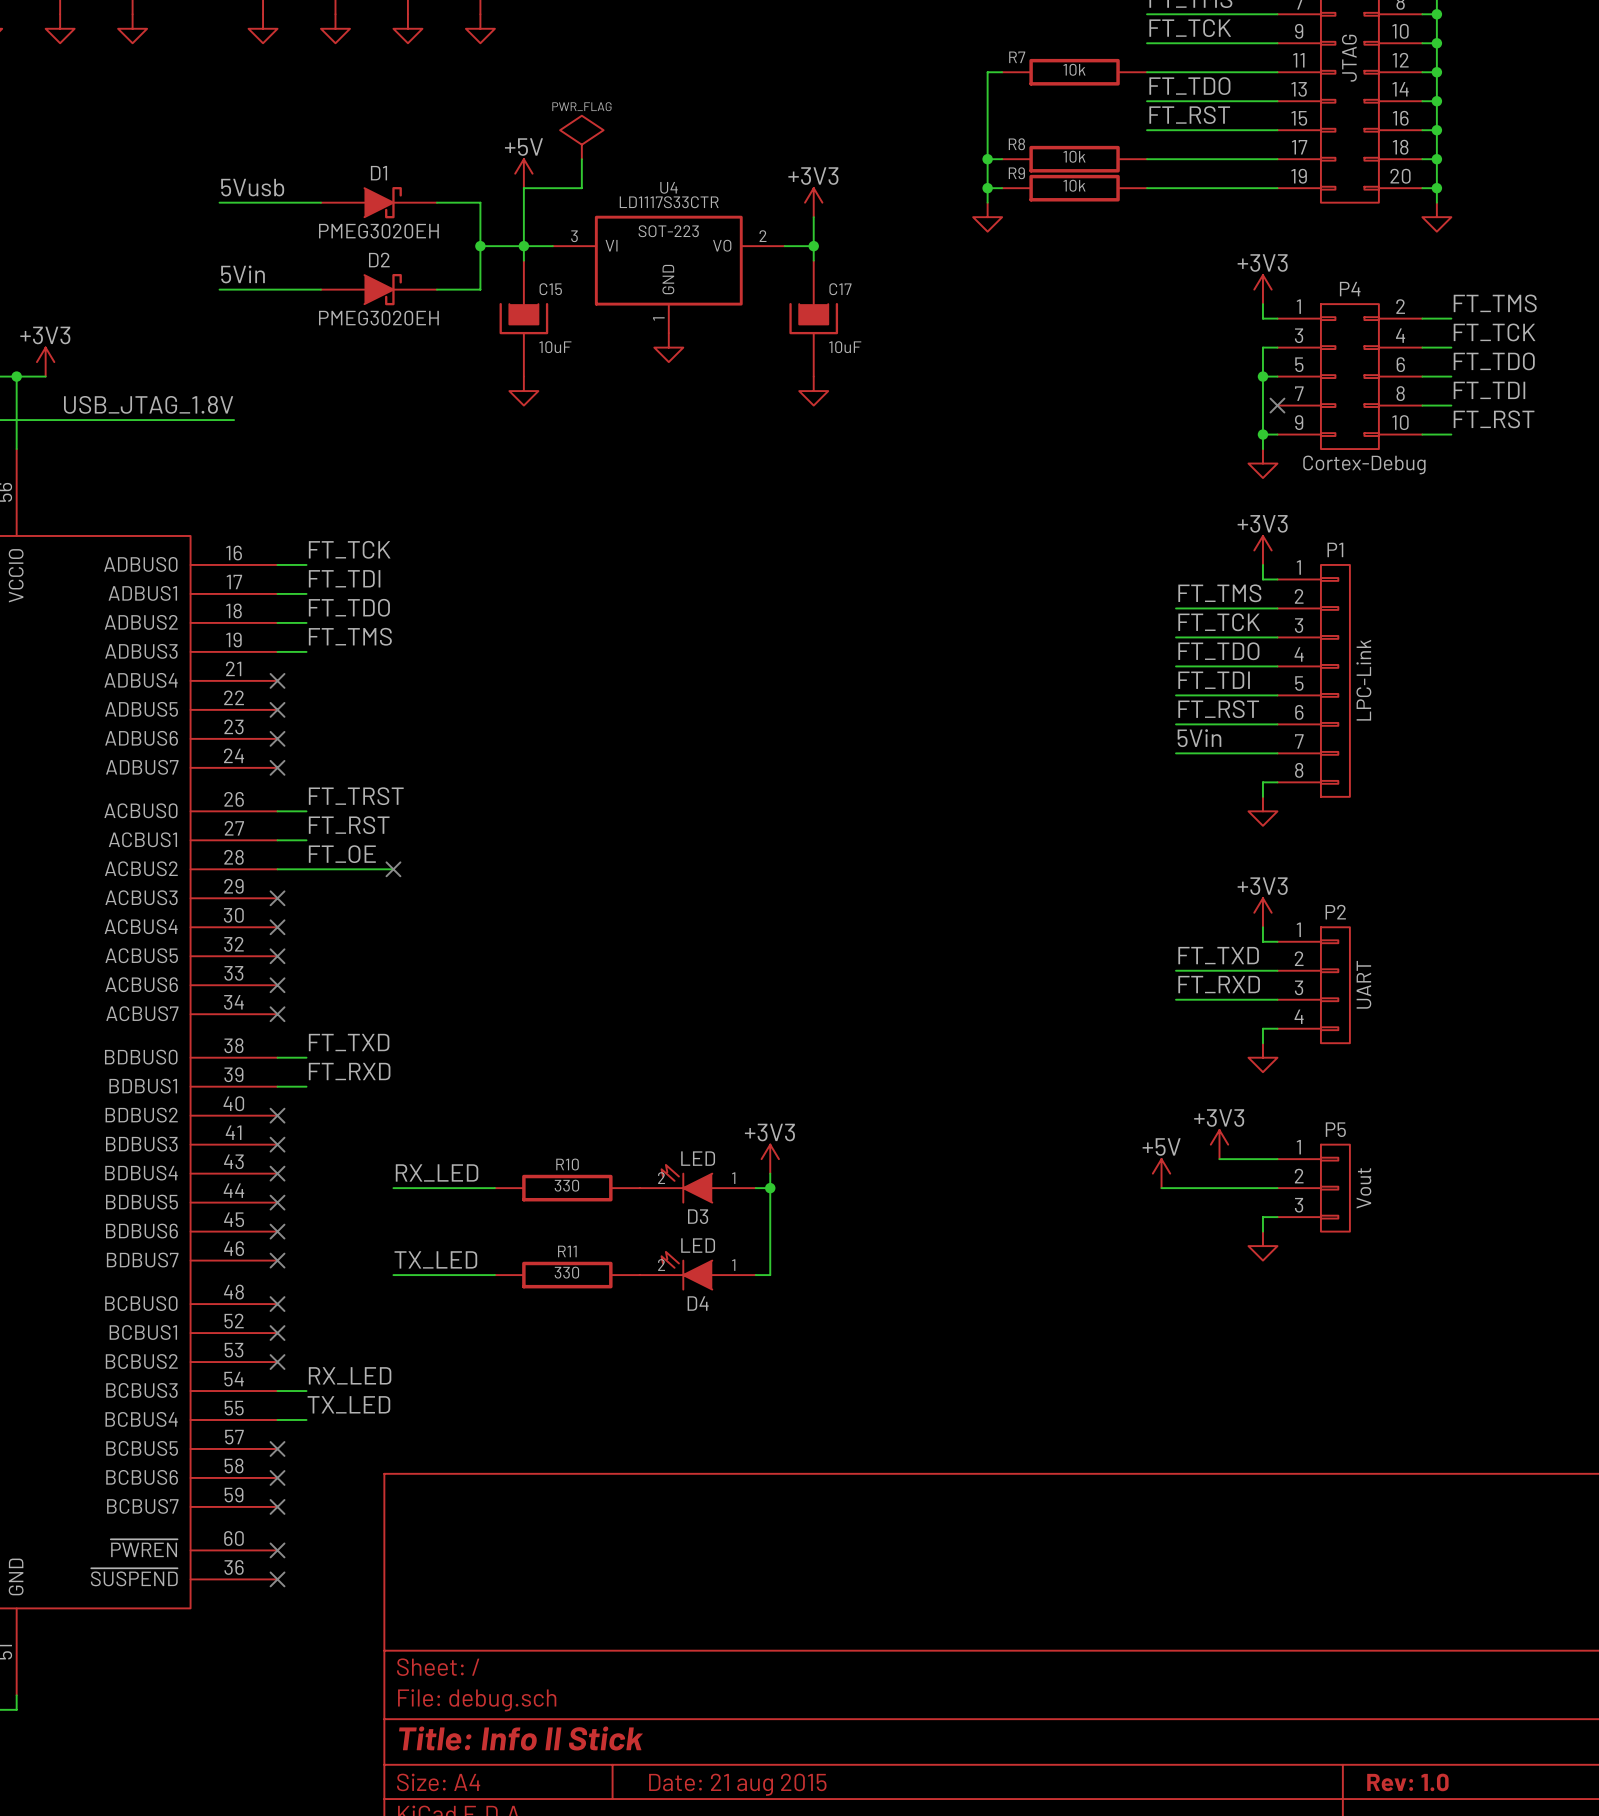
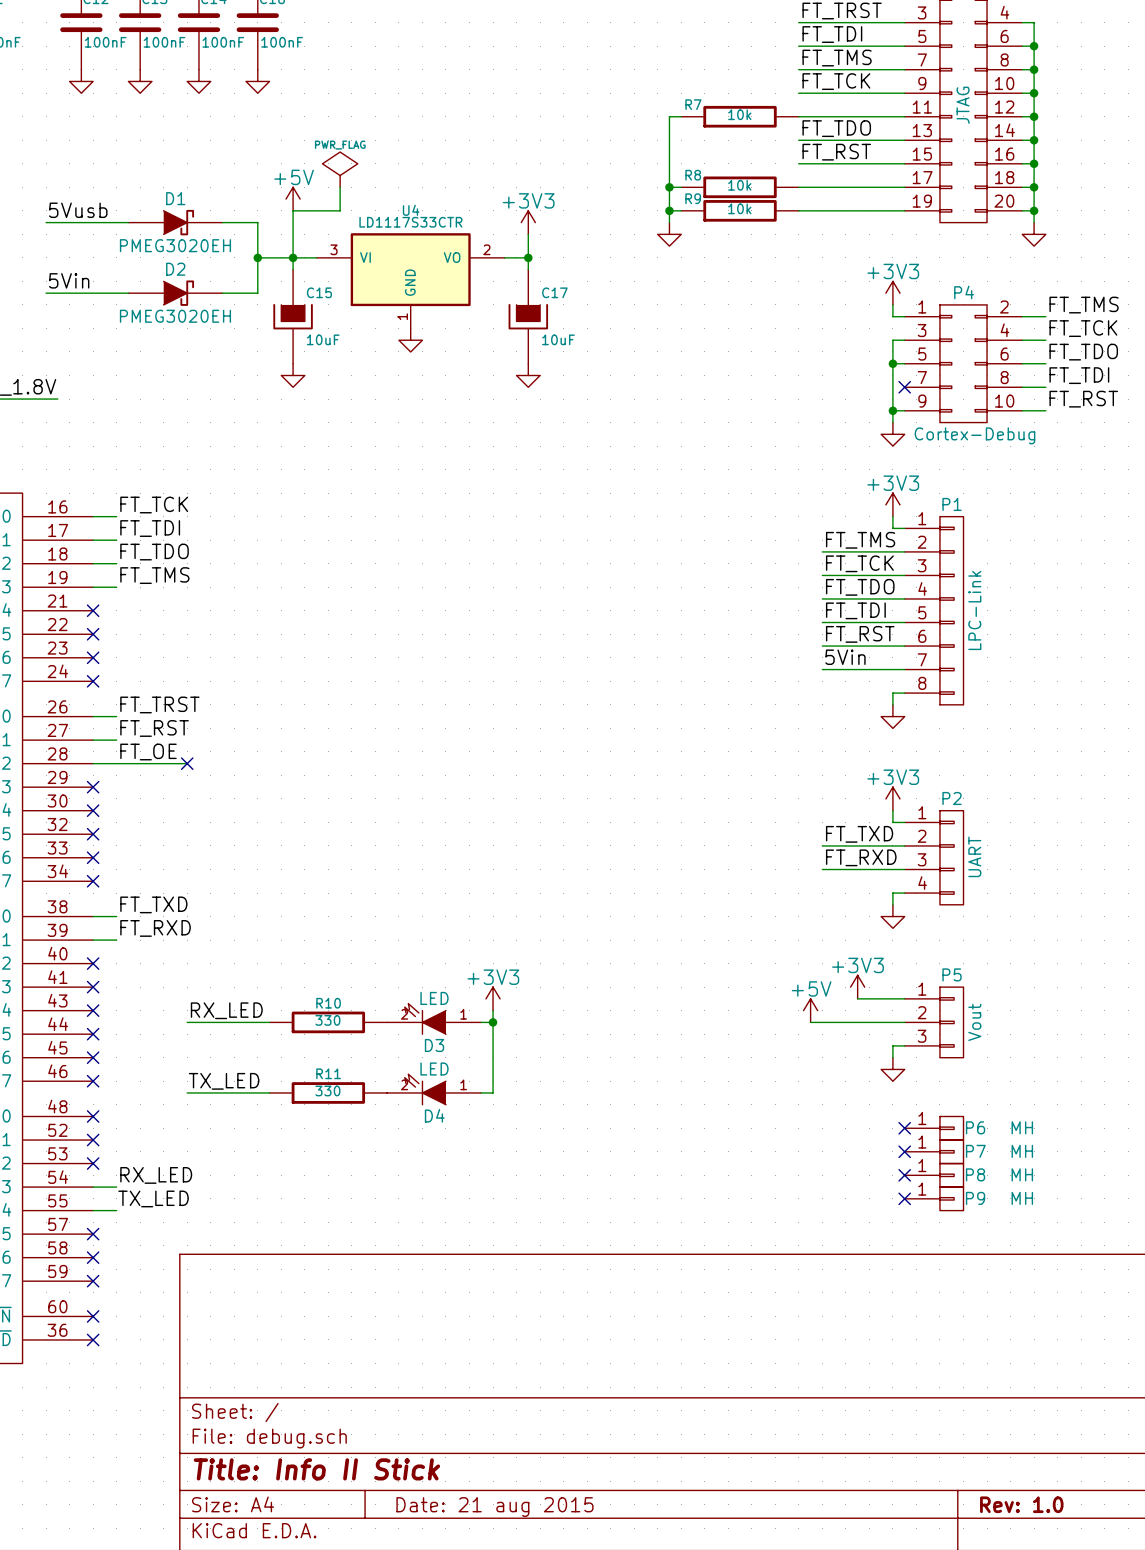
U4 text: SOT-223 (668, 231) -> none
no-connect mark: none -> (904, 1128)
P6: none -> MH (934, 1128)
no-connect mark: none -> (904, 1151)
P7: none -> MH (934, 1151)
no-connect mark: none -> (904, 1175)
P8: none -> MH (934, 1175)
no-connect mark: none -> (904, 1198)
P9: none -> MH (934, 1198)

